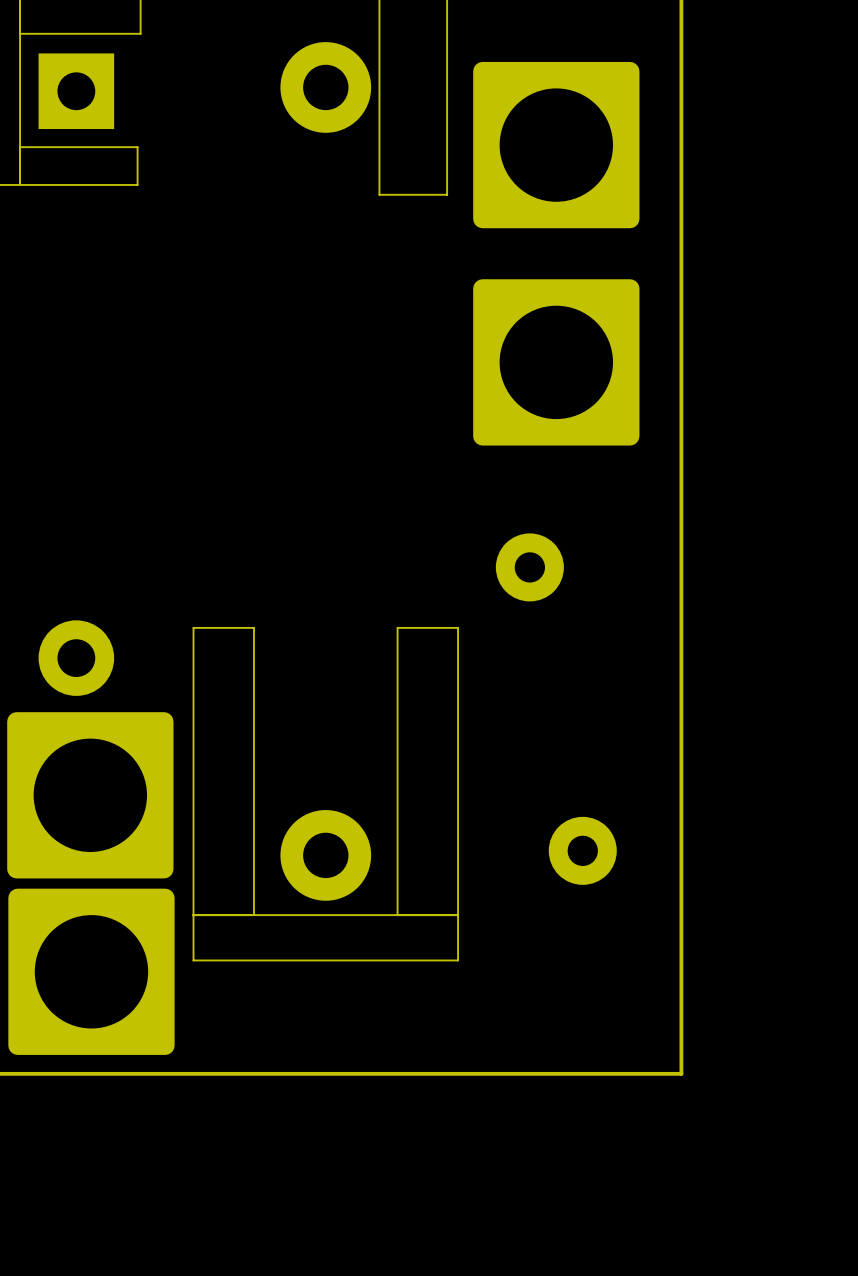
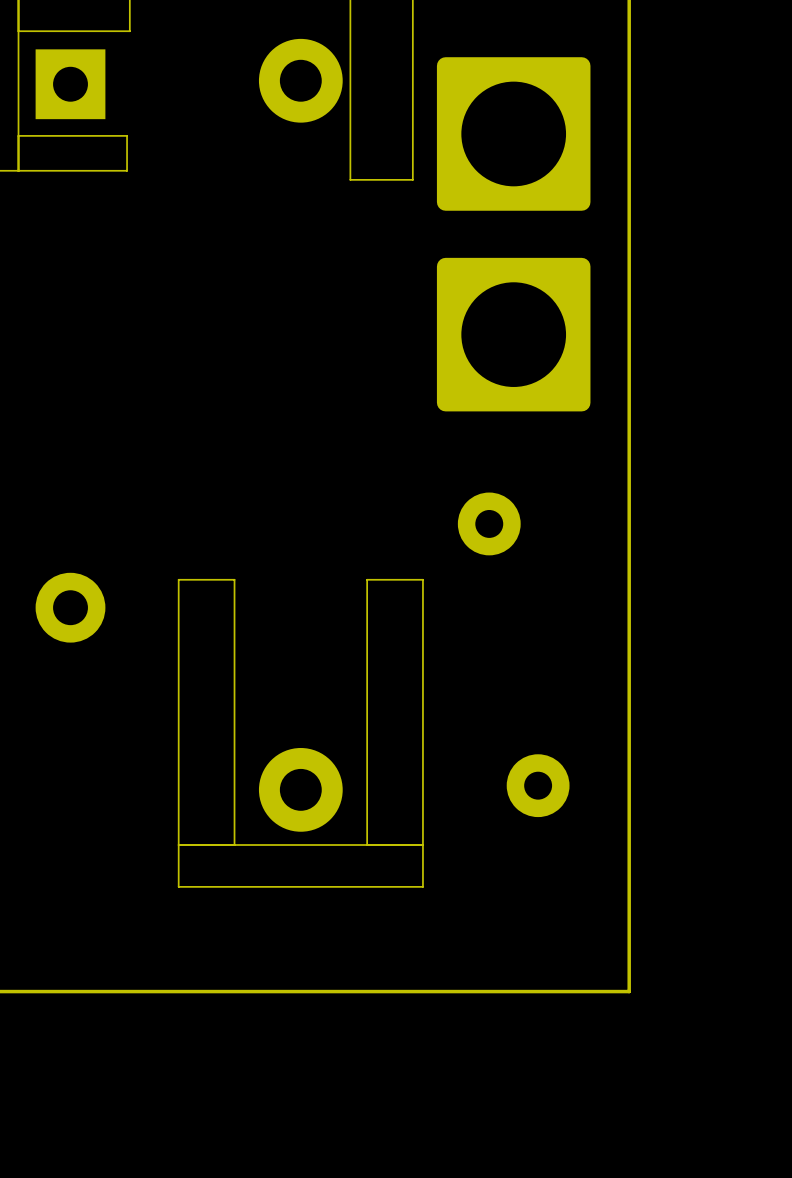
part: (90, 795) -> none
part: (91, 971) -> none

